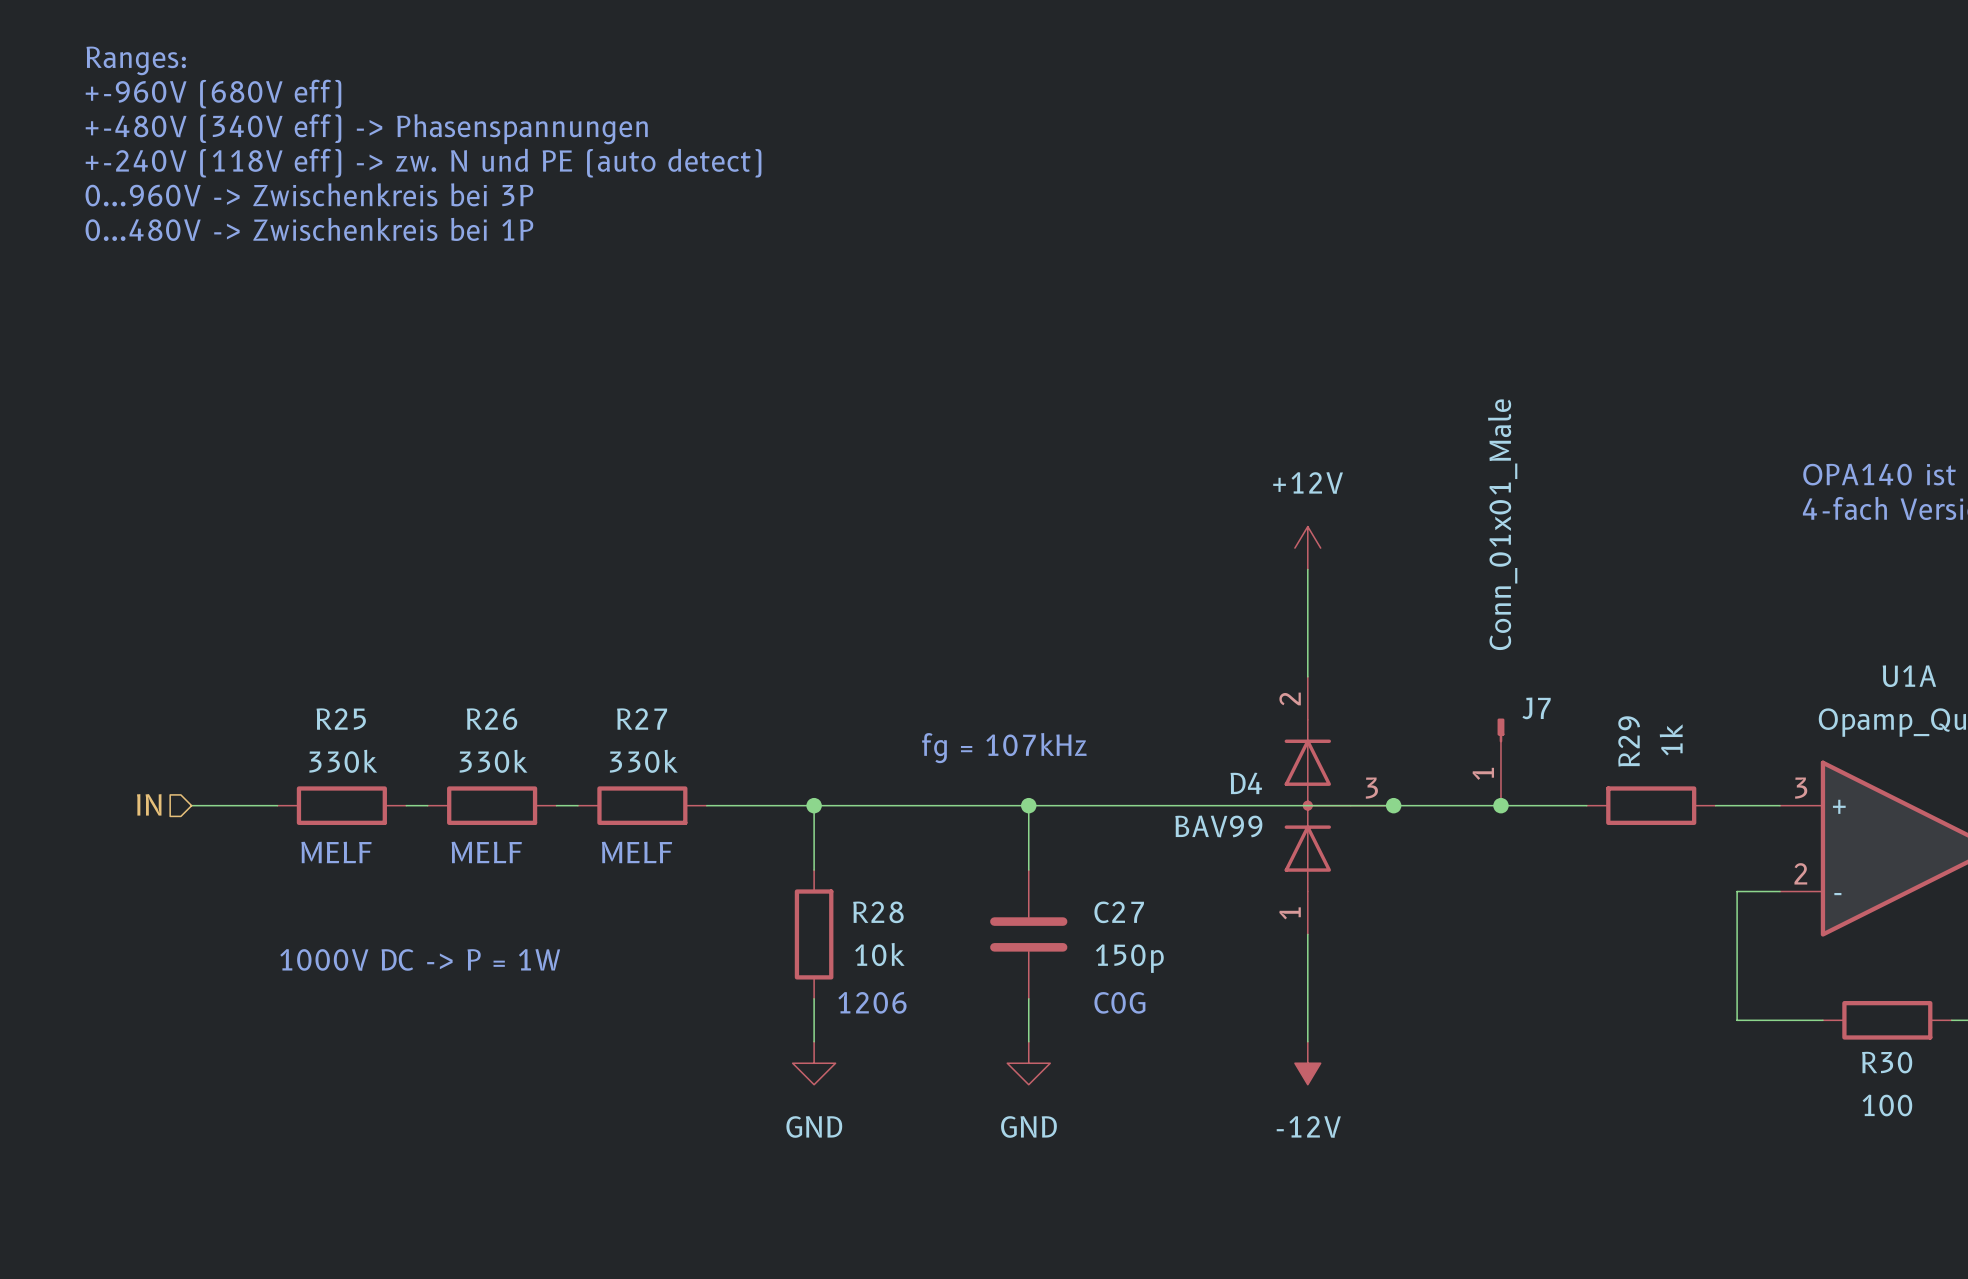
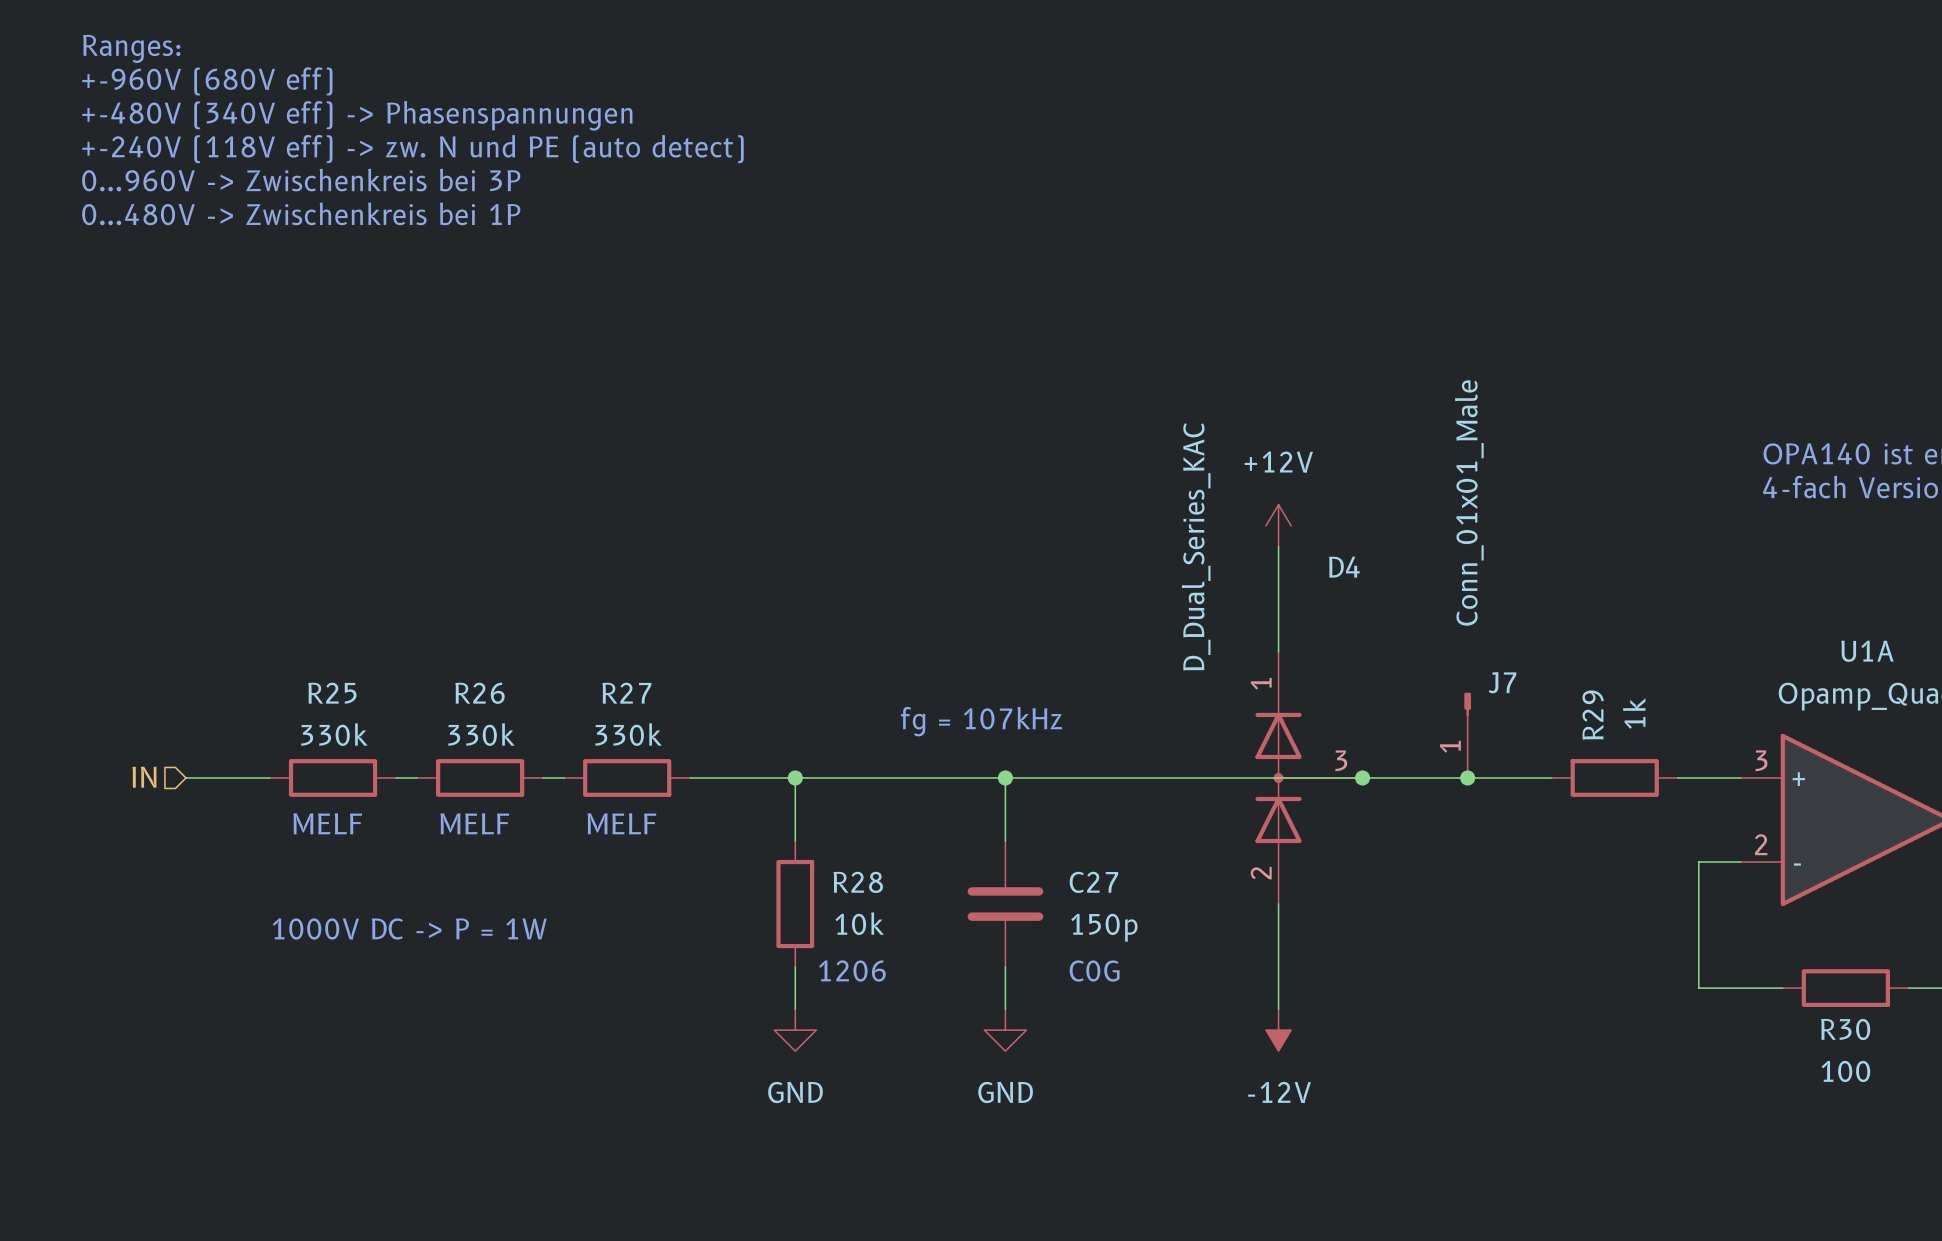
D4 symbol: [1284, 676, 1394, 935] -> [1255, 651, 1363, 905]
D4 name position: D4 (1246, 783) -> D4 (1344, 567)
D4 value: BAV99 (1218, 826) -> D_Dual_Series_KAC (1196, 546)

